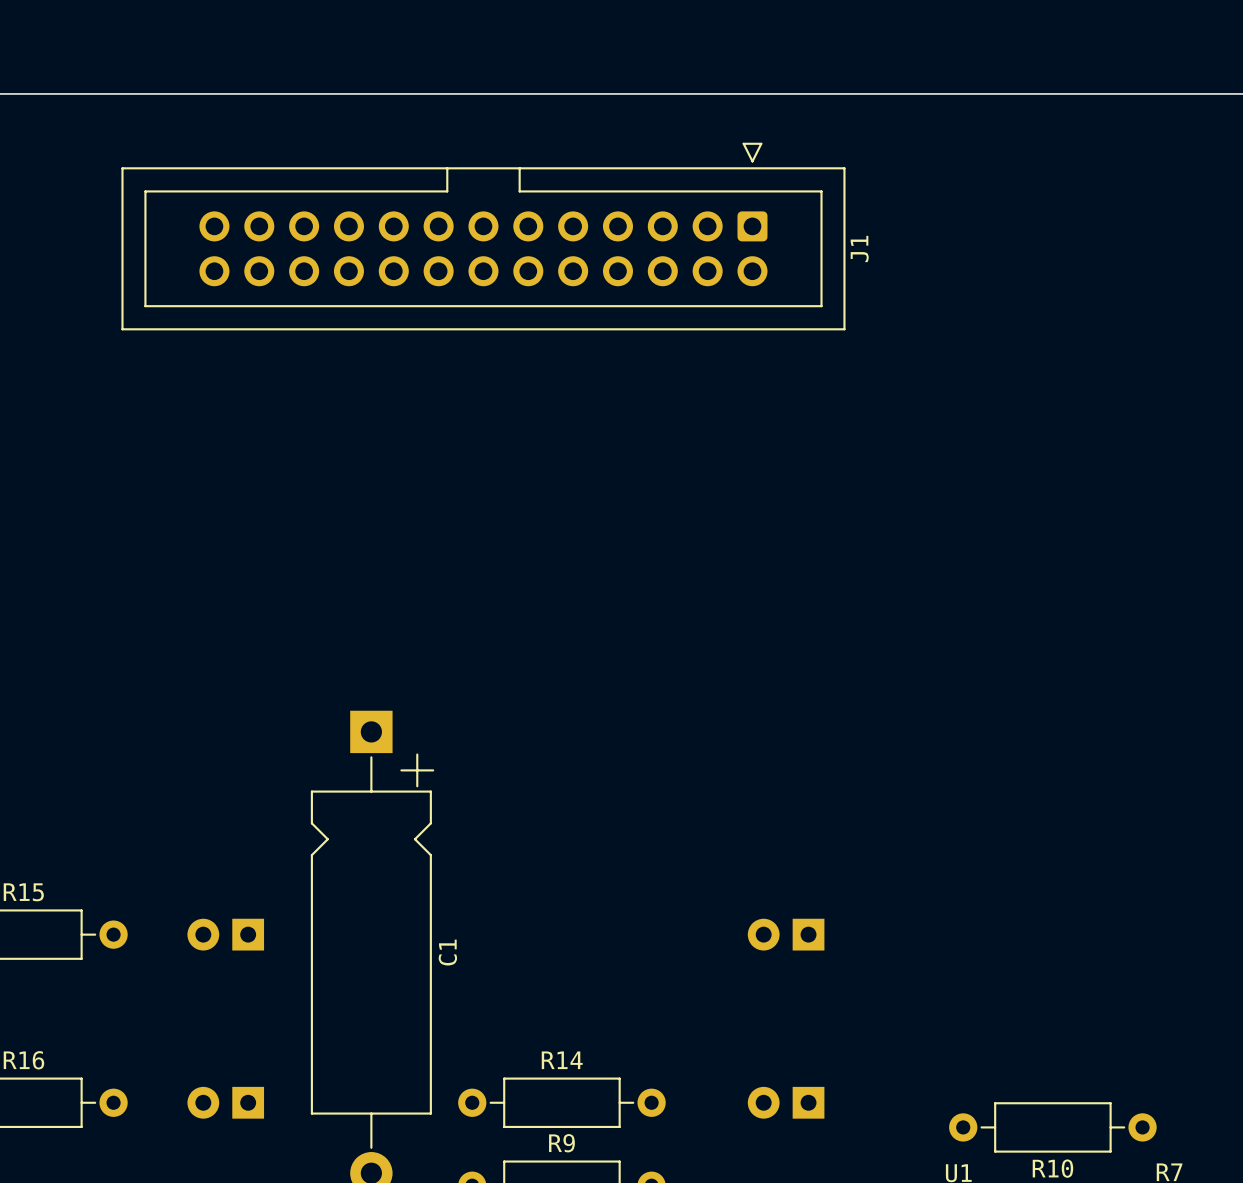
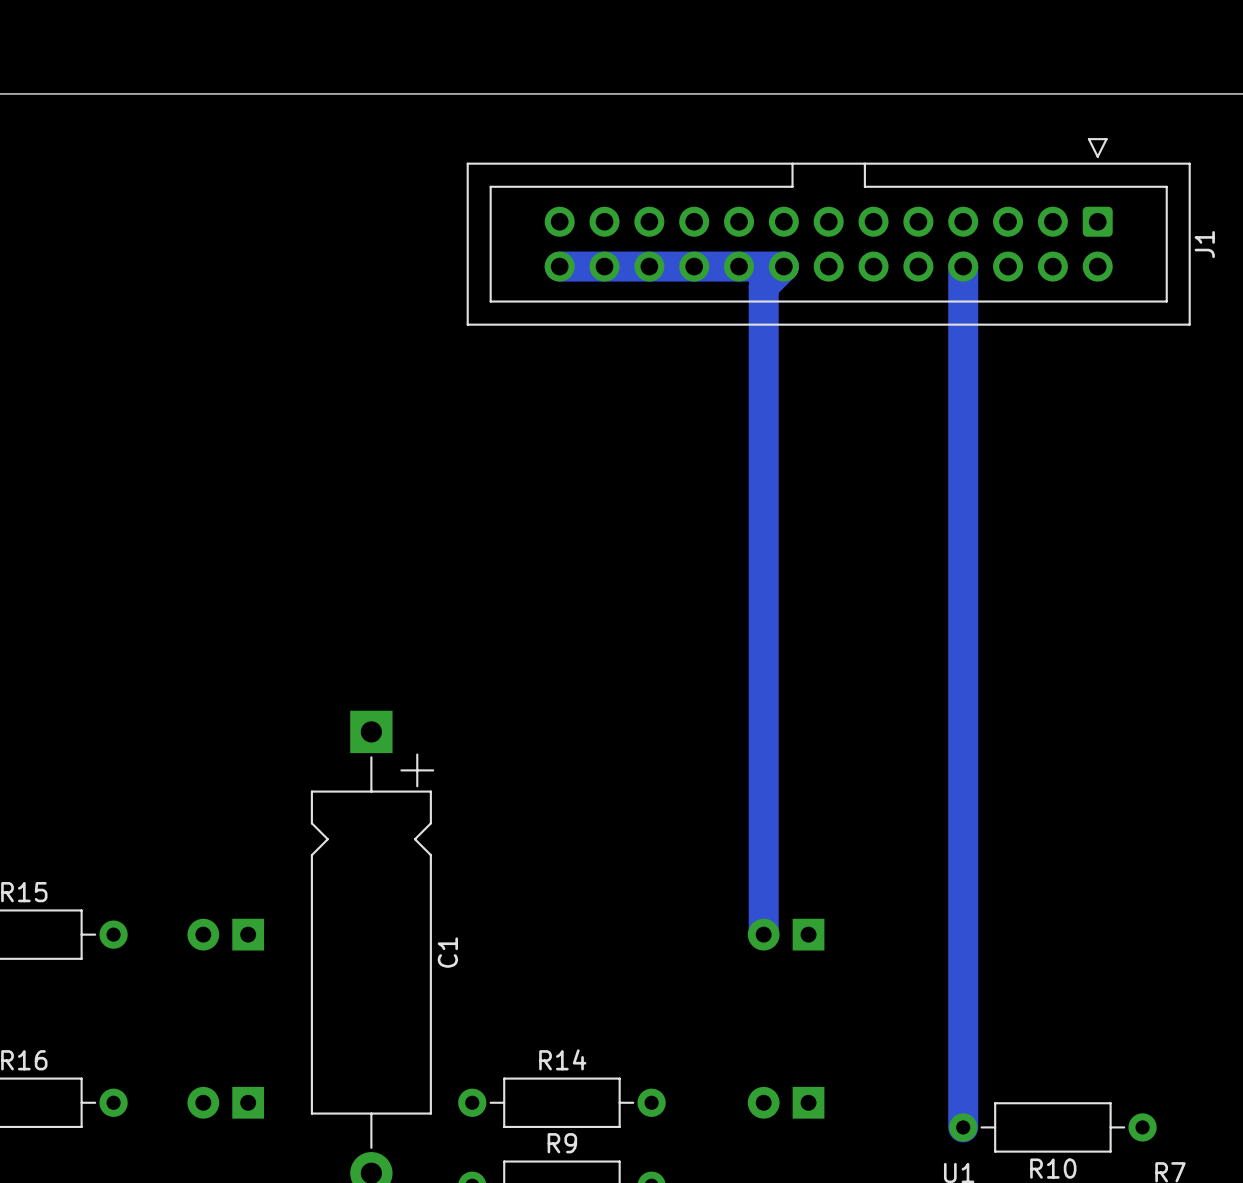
J1 position: (483, 236) -> (828, 231)
bottom track: none -> (559, 266) (783, 266) (763, 286) (763, 934)
bottom track: none -> (963, 266) (963, 1127)

